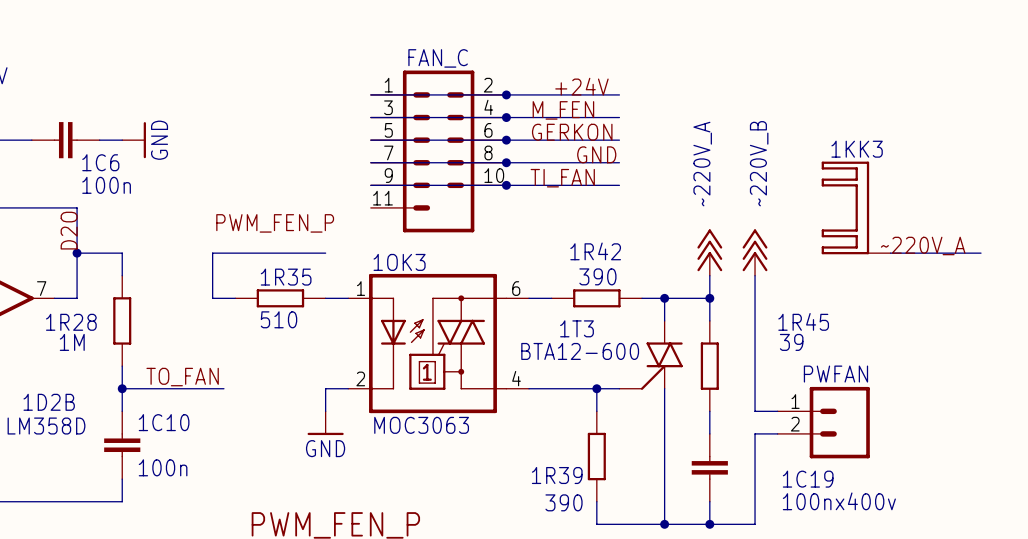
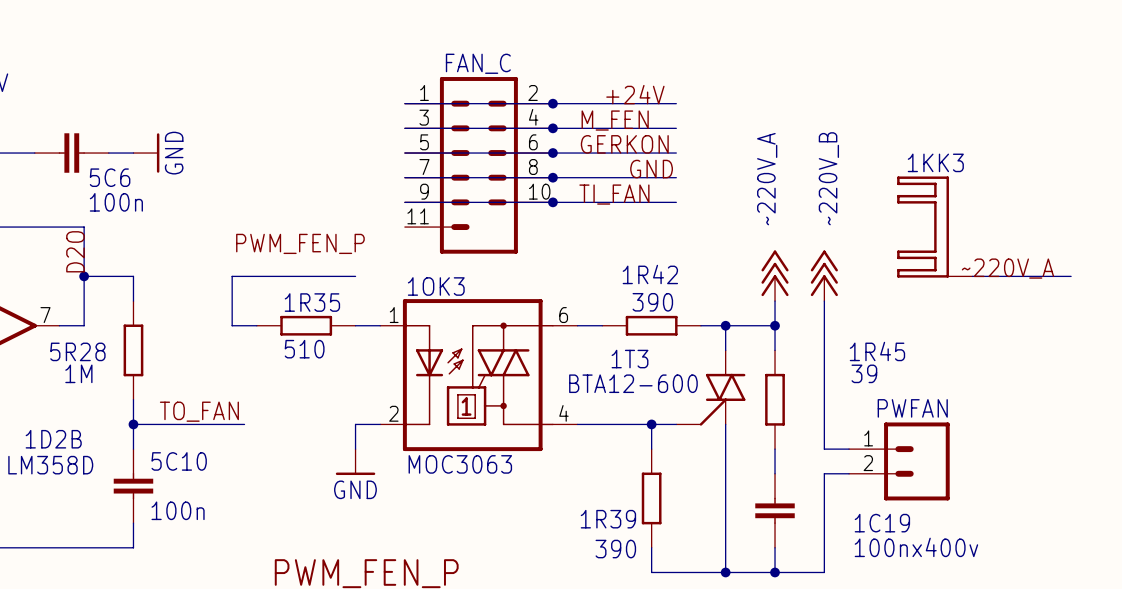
1C6 name: 1C6 (100, 162) -> 5C6 (110, 177)
1R28 name: 1R28 (71, 322) -> 5R28 (77, 351)
1C10 name: 1C10 (164, 422) -> 5C10 (179, 461)

